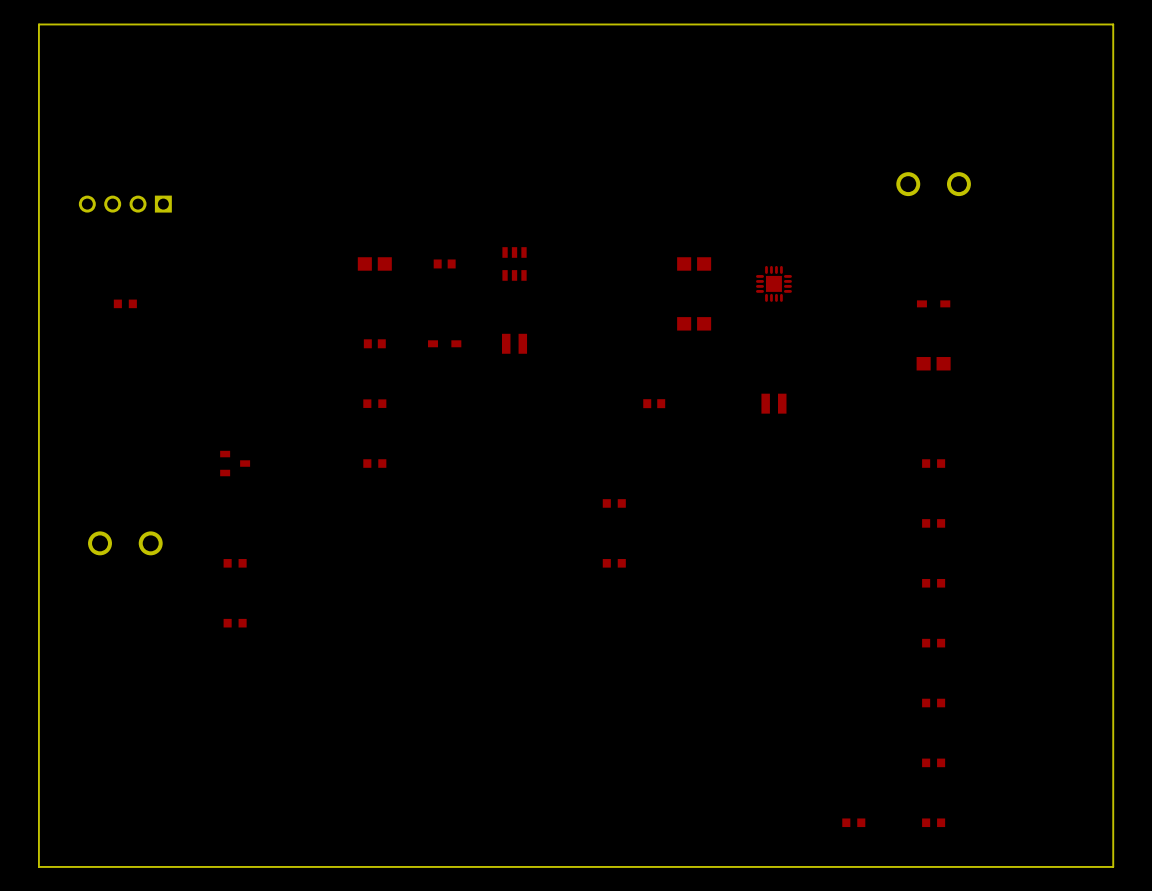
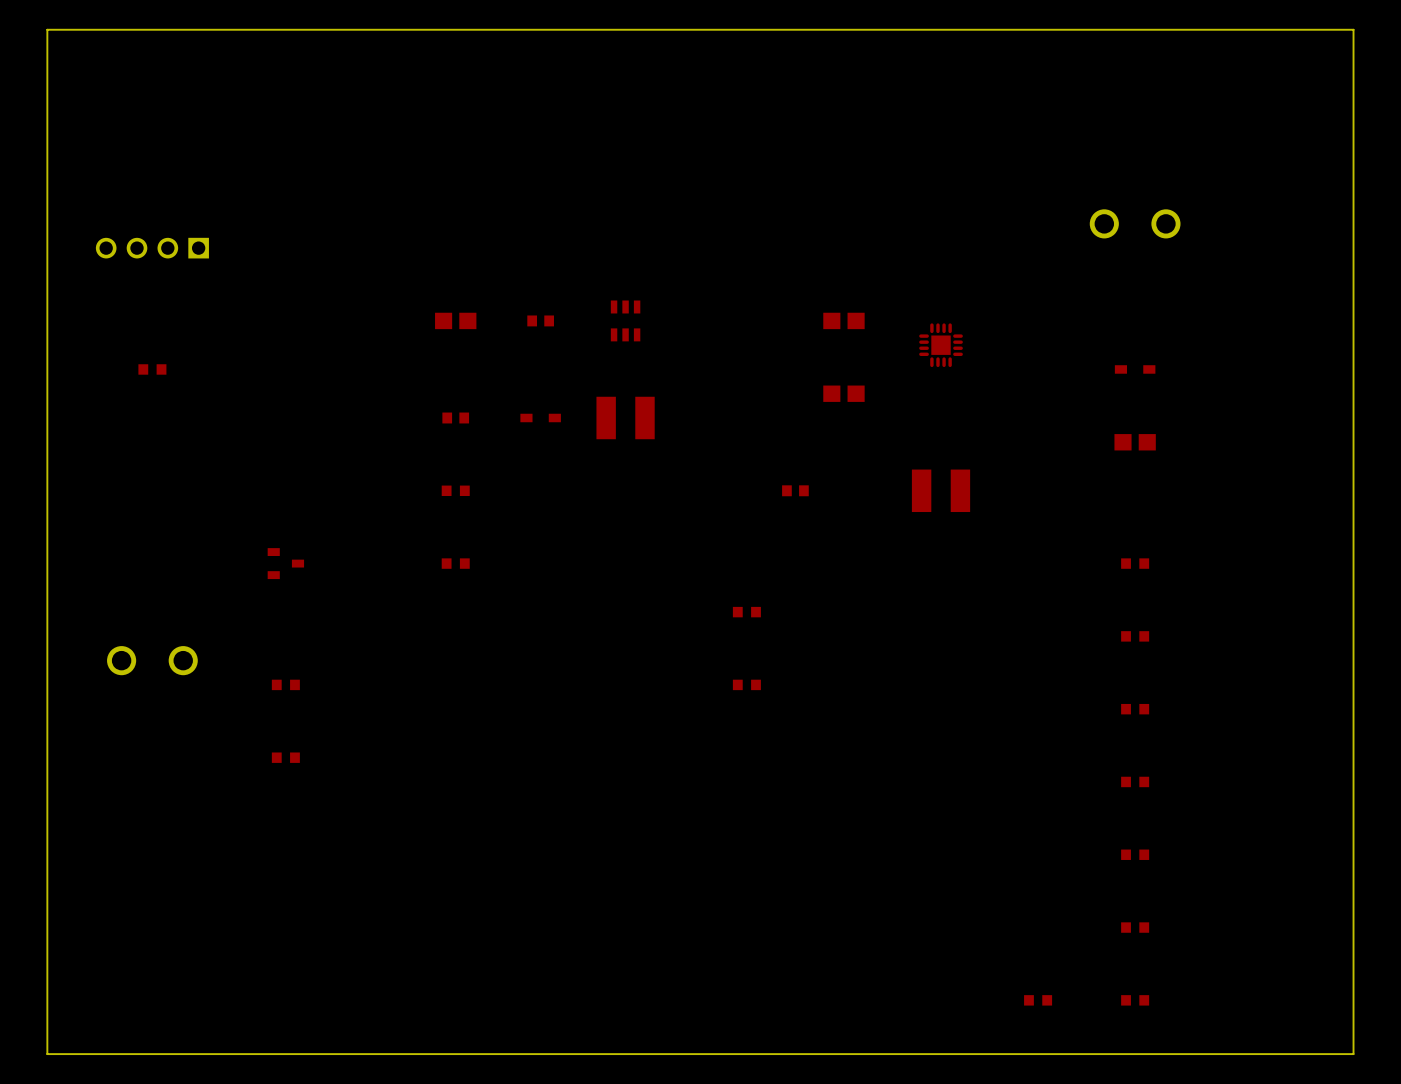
part footprint: [501, 333, 528, 354] -> [596, 396, 655, 440]
part footprint: [761, 393, 787, 414] -> [911, 469, 971, 513]

